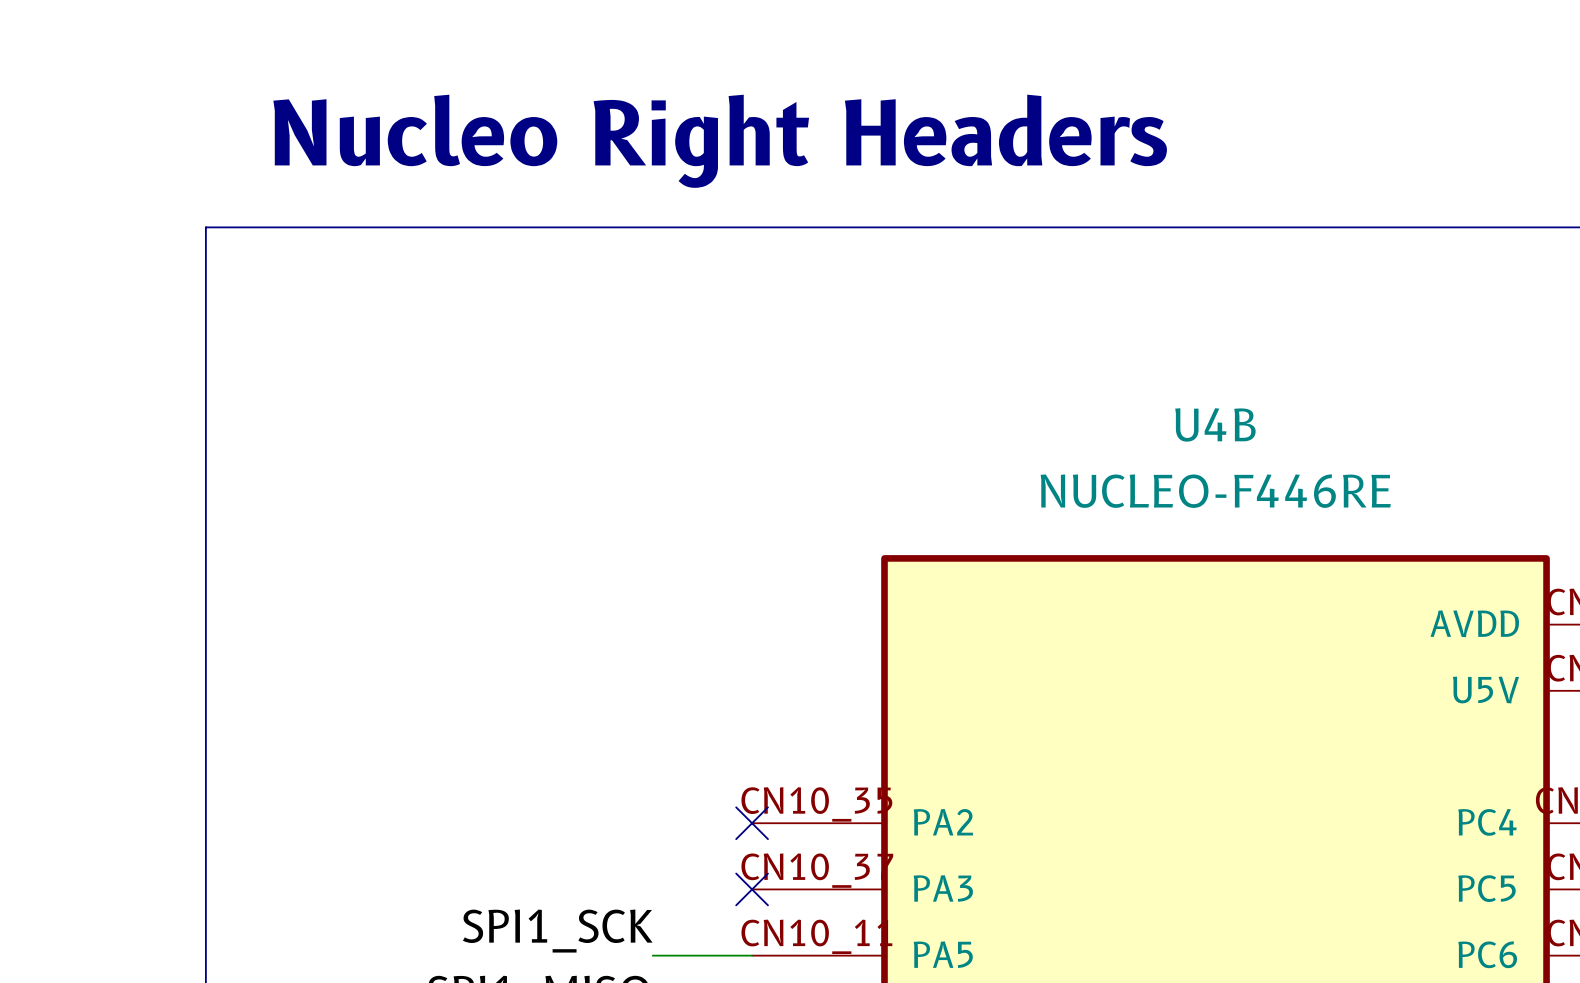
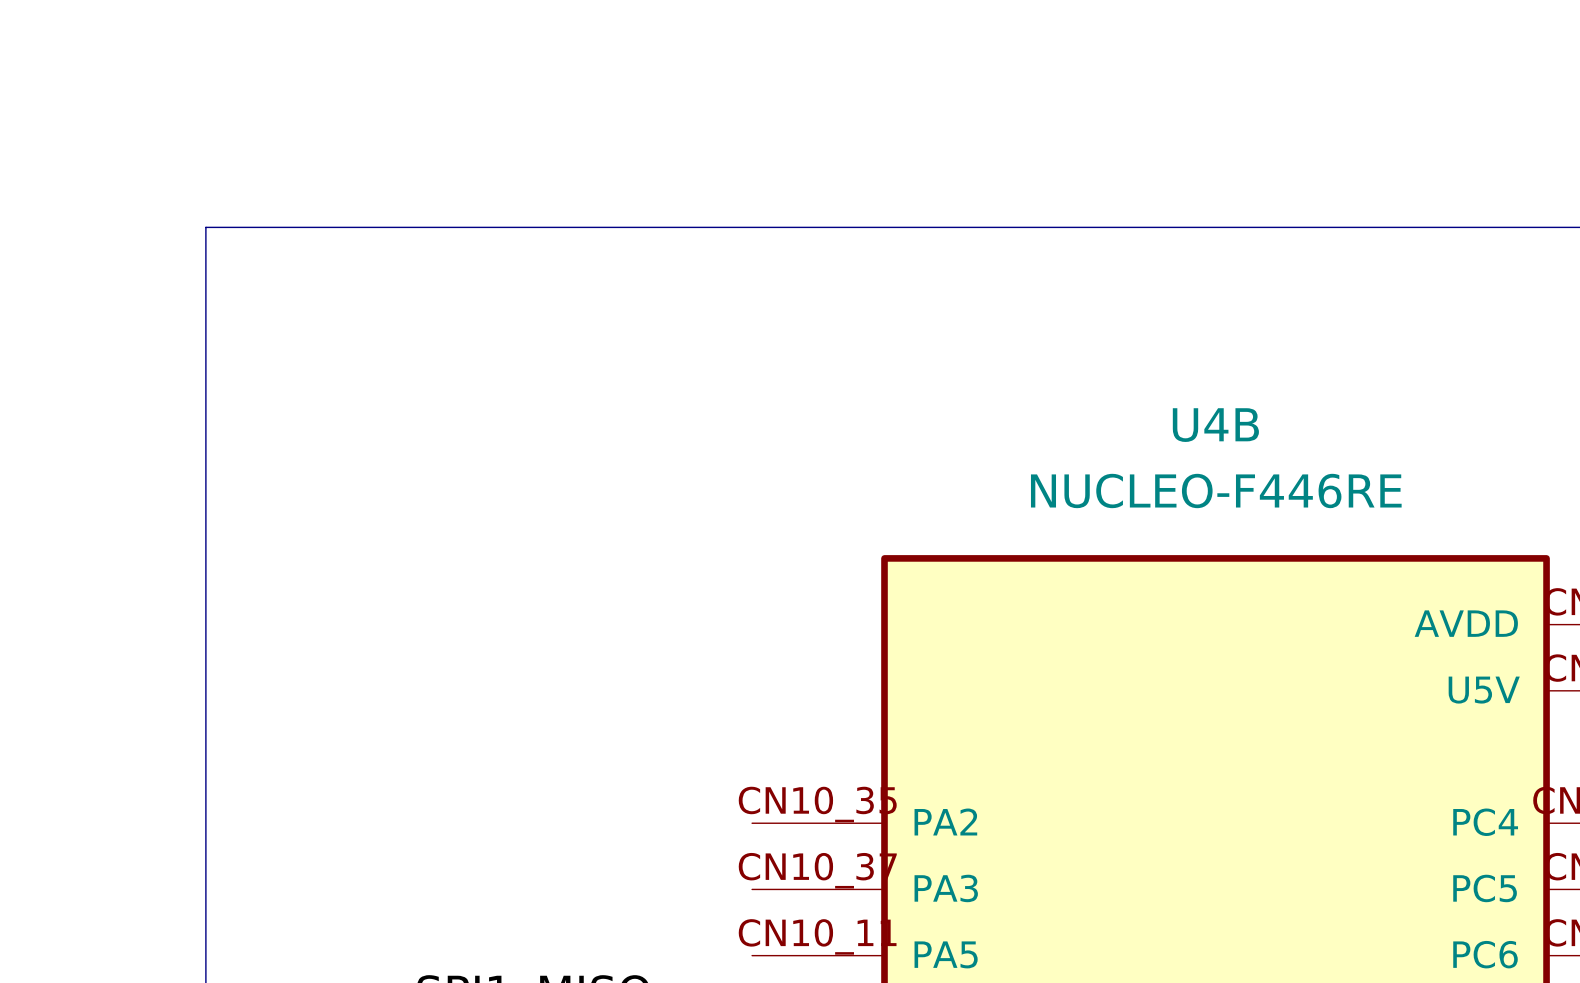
text: Nucleo Right Headers (720, 141) -> none
no-connect mark: (752, 823) -> none
no-connect mark: (752, 889) -> none
label: SPI1_SCK (557, 931) -> none
wire: (652, 955) (752, 955) -> none

